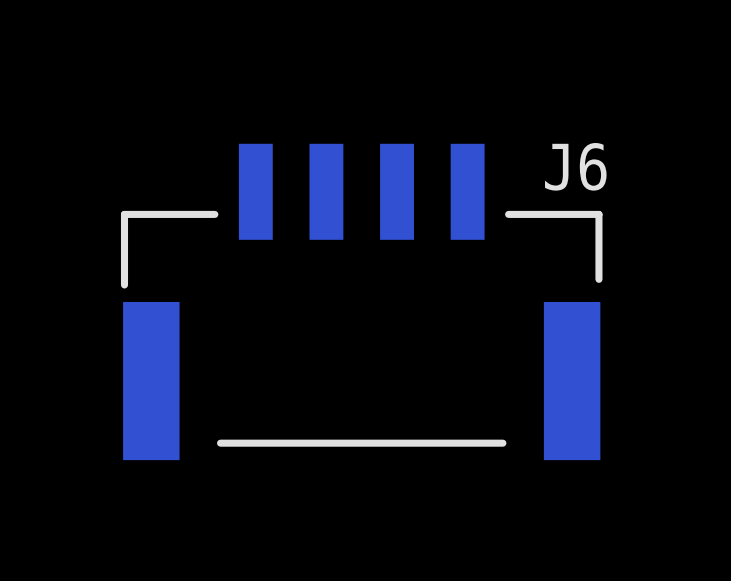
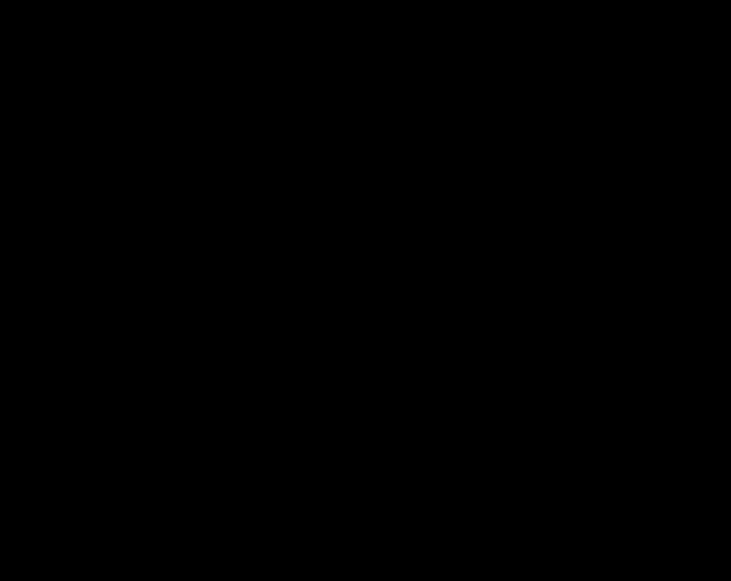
J6: (361, 301) -> none

